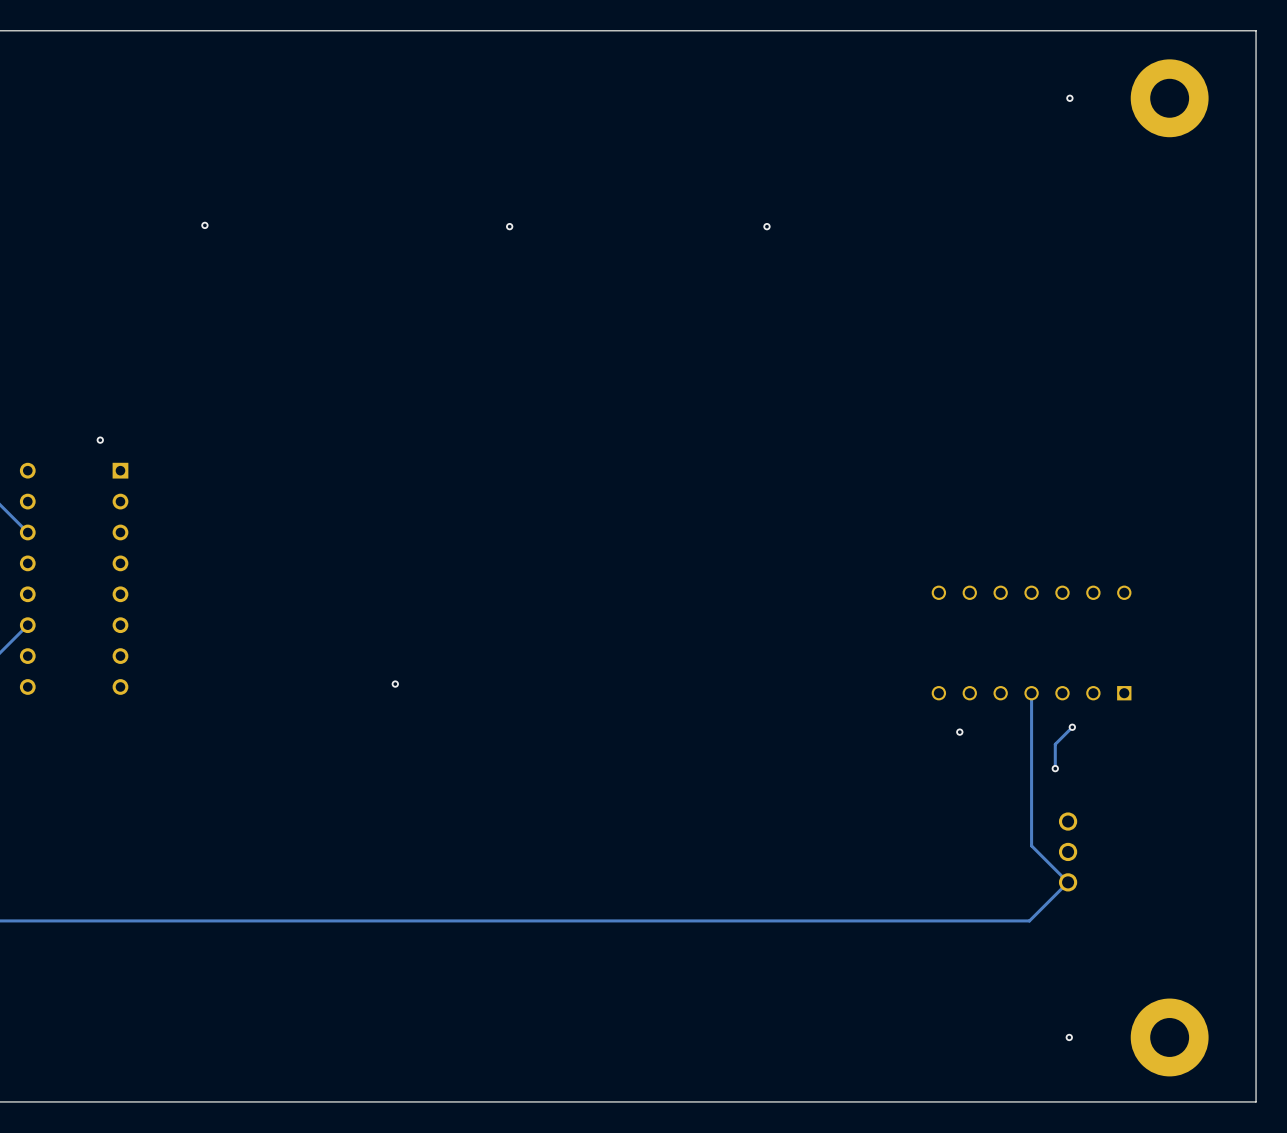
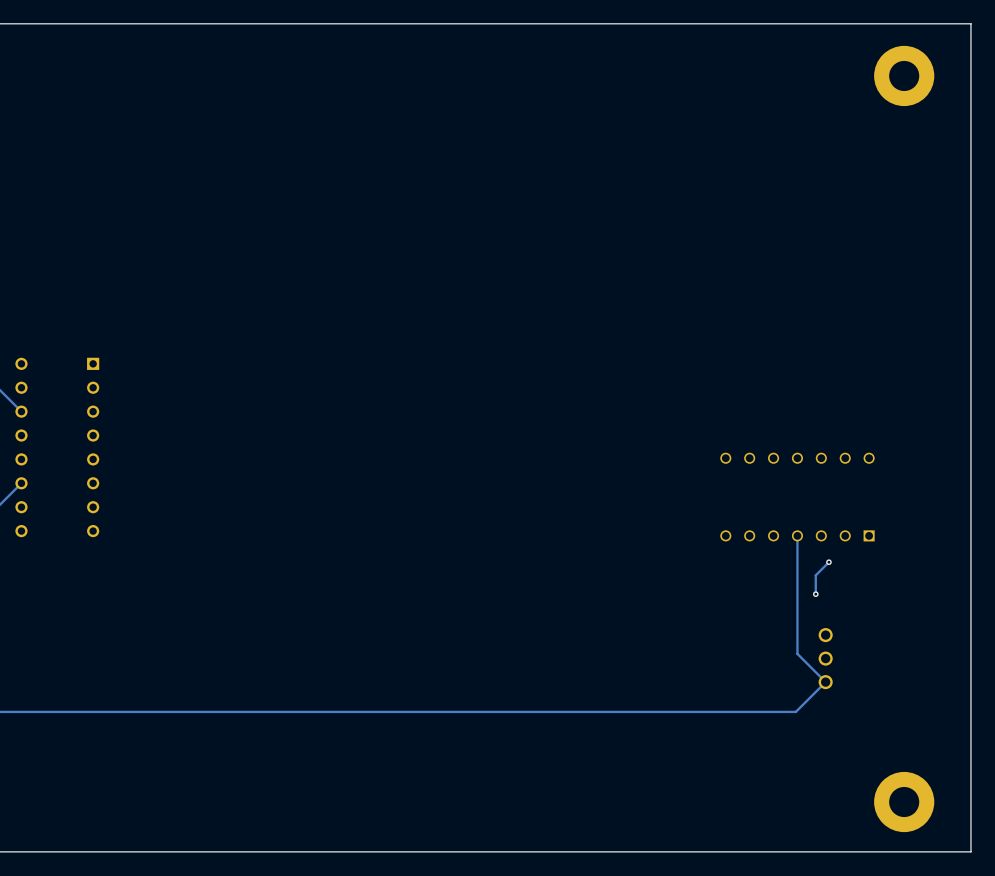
via: (1069, 98) -> none
via: (204, 225) -> none
via: (509, 226) -> none
via: (766, 226) -> none
via: (100, 440) -> none
via: (395, 684) -> none
via: (959, 732) -> none
via: (1069, 1037) -> none

